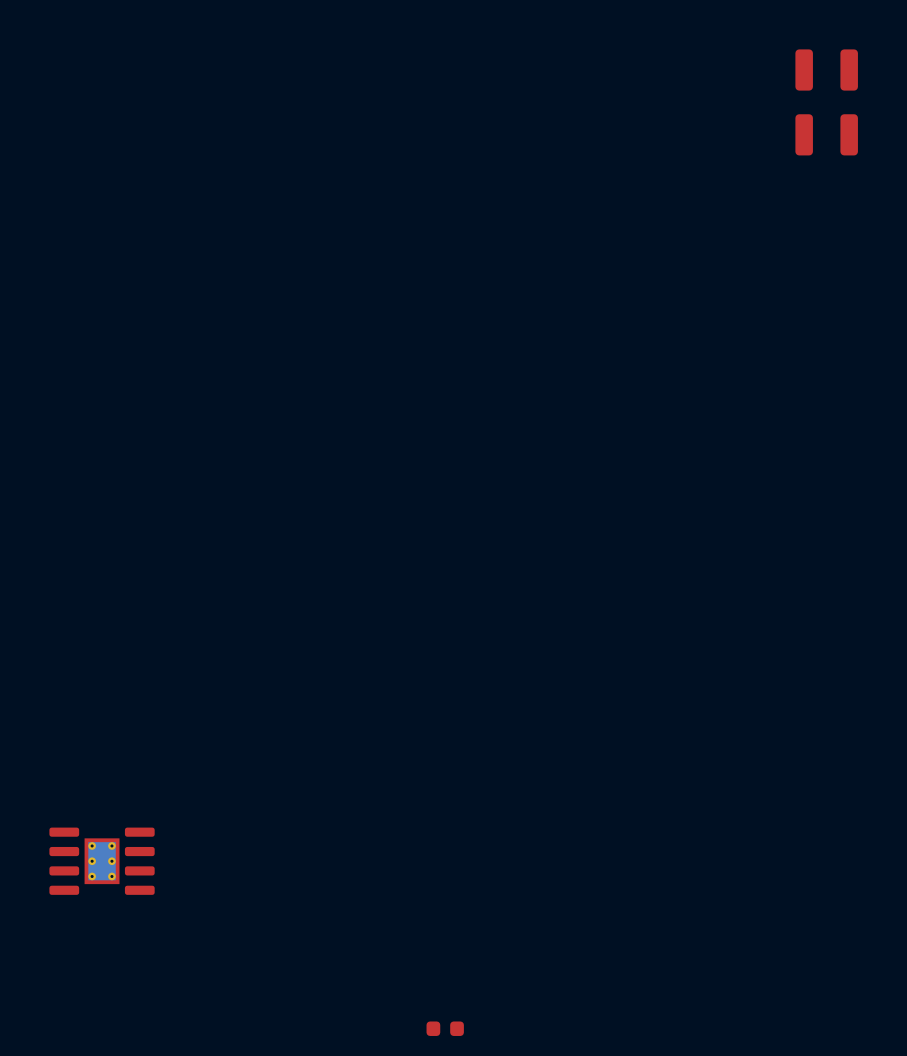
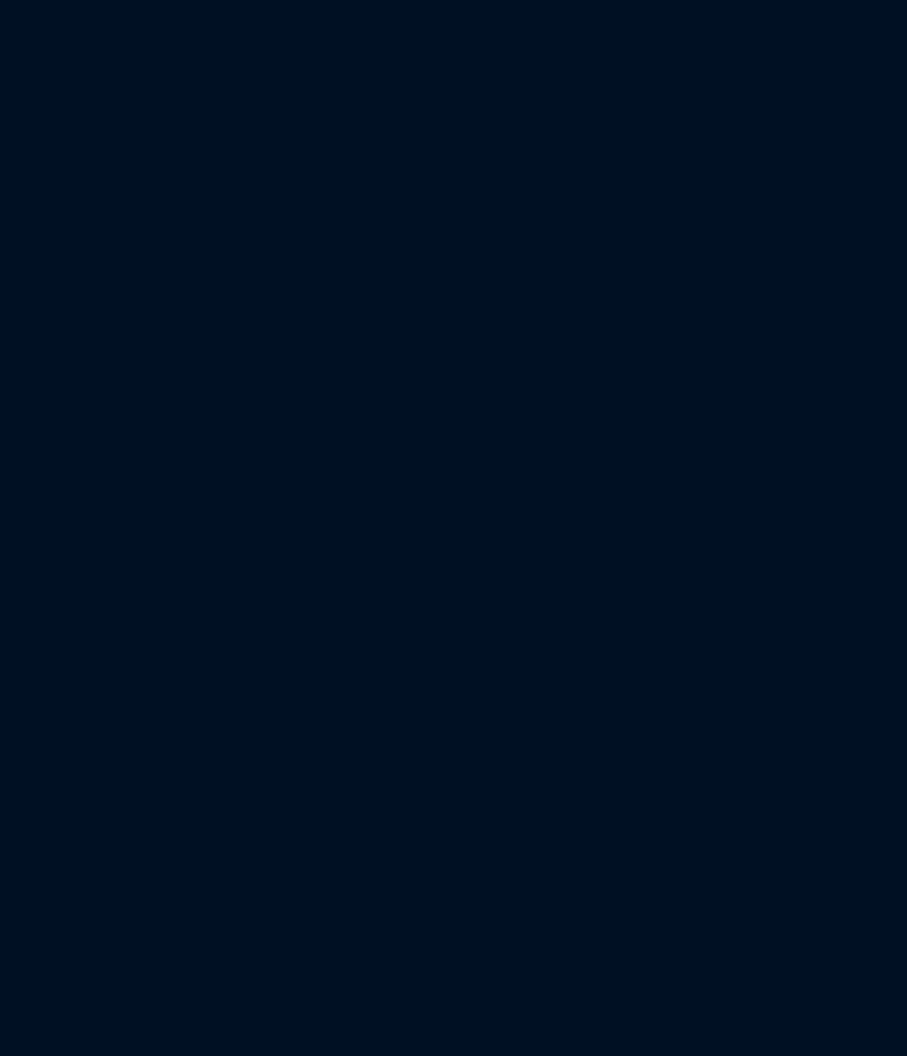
part: (826, 70) -> none
part: (826, 134) -> none
part: (102, 861) -> none
part: (445, 1028) -> none

